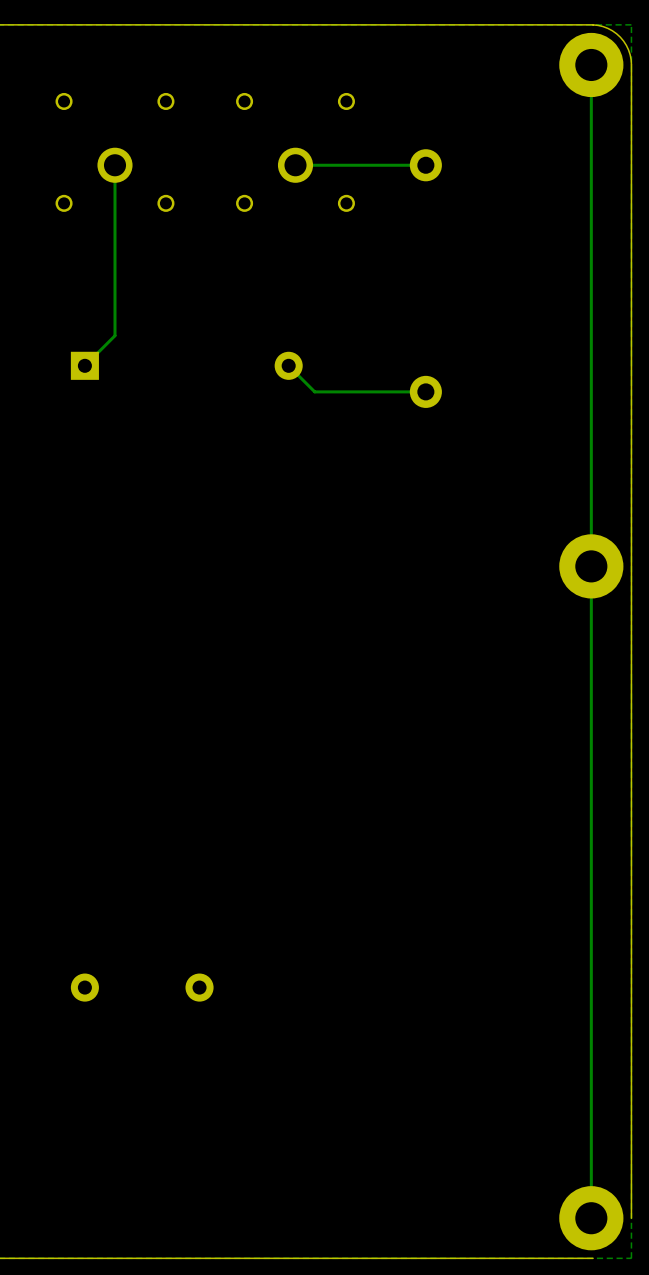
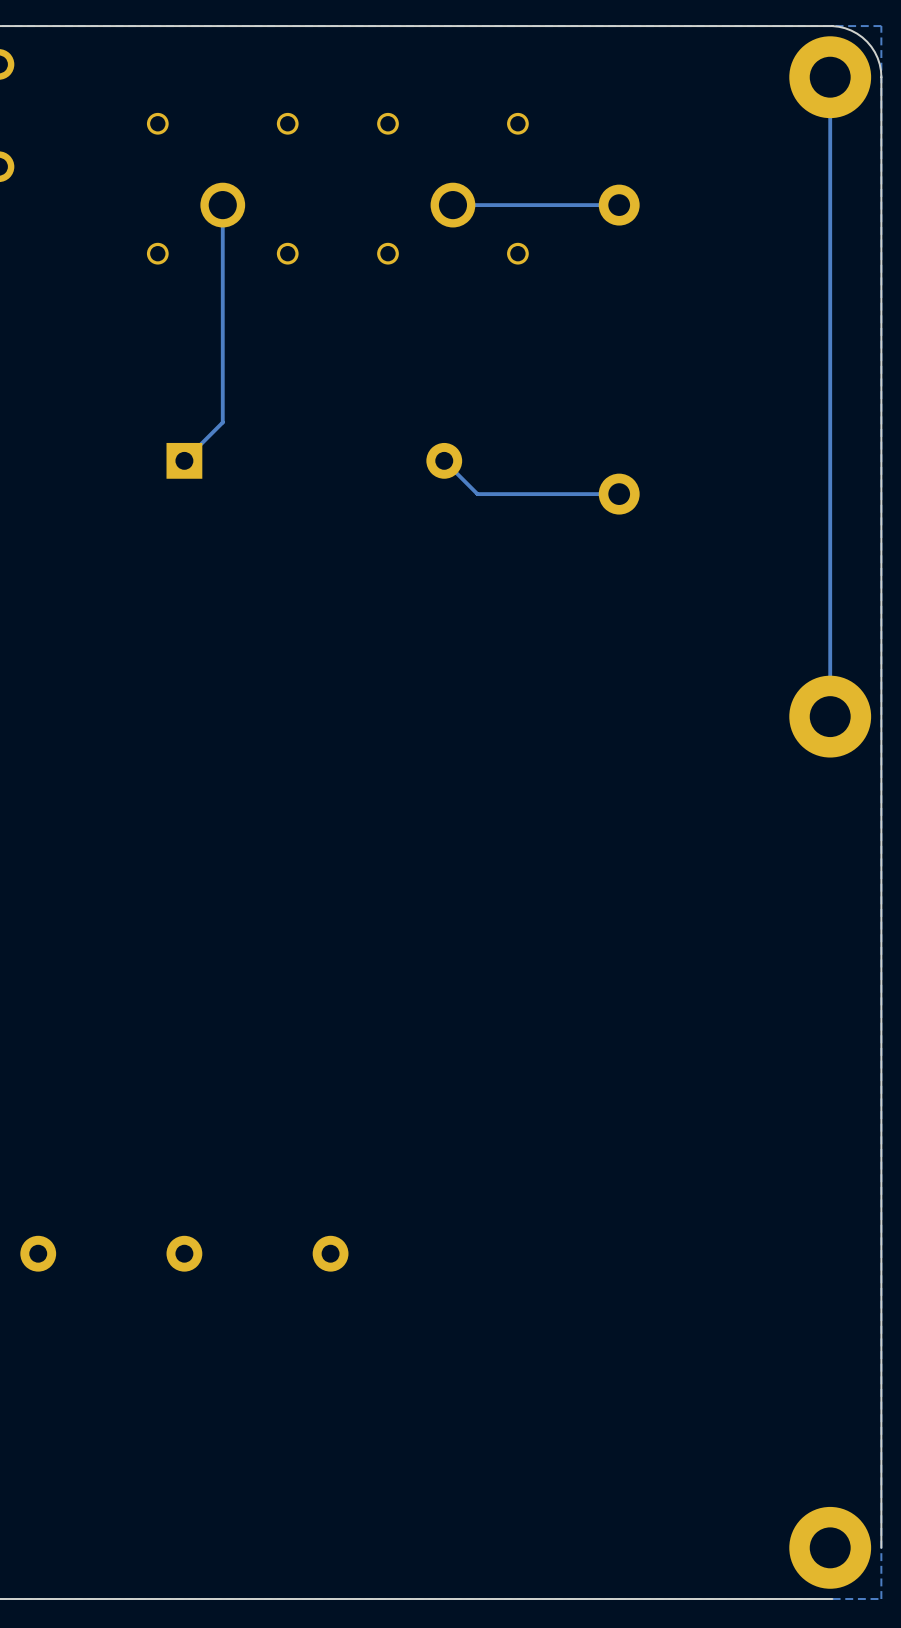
track: (591, 566) (591, 1218) -> none

